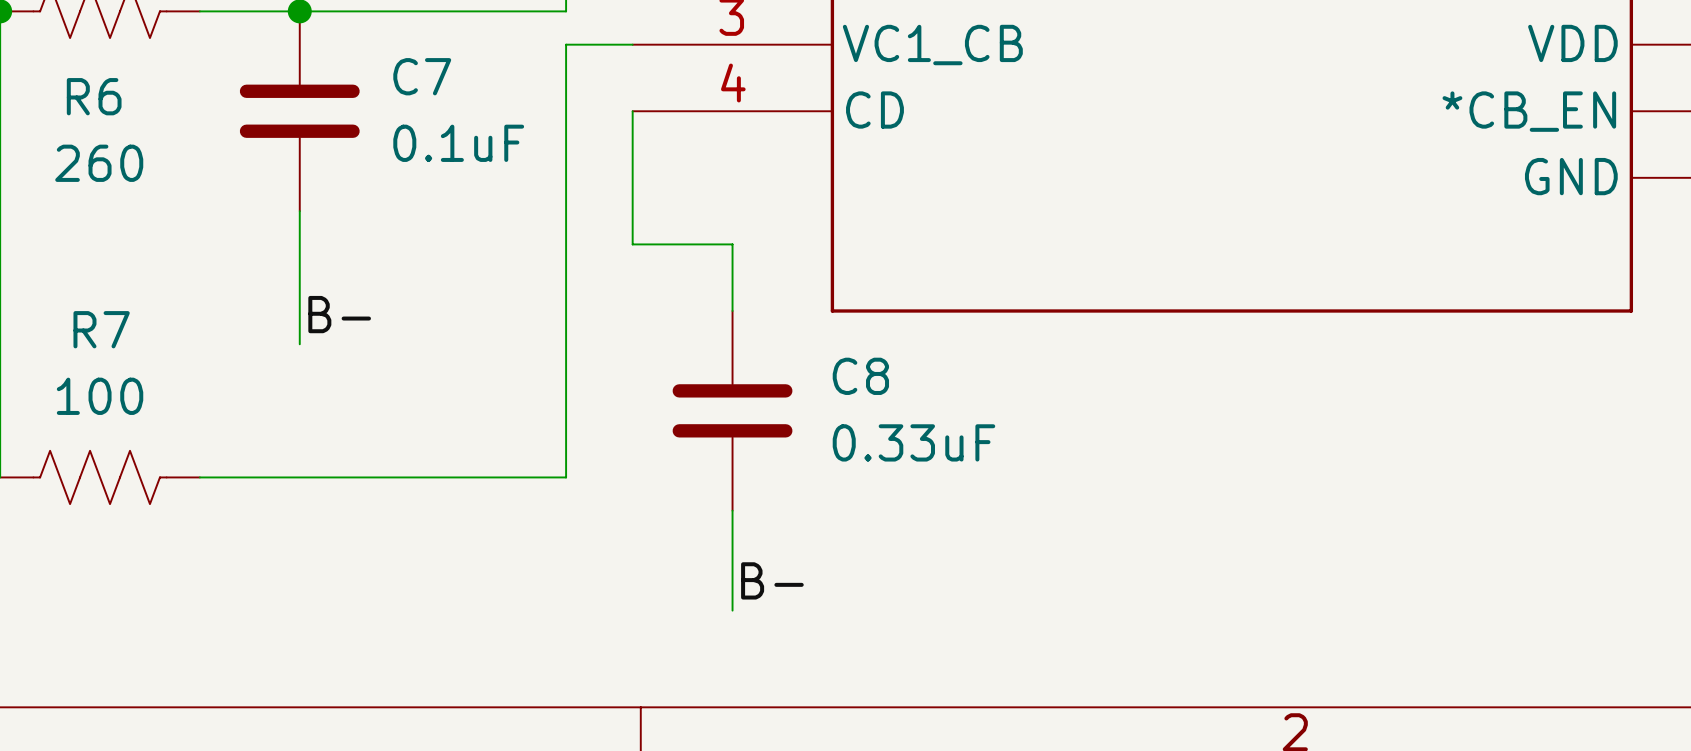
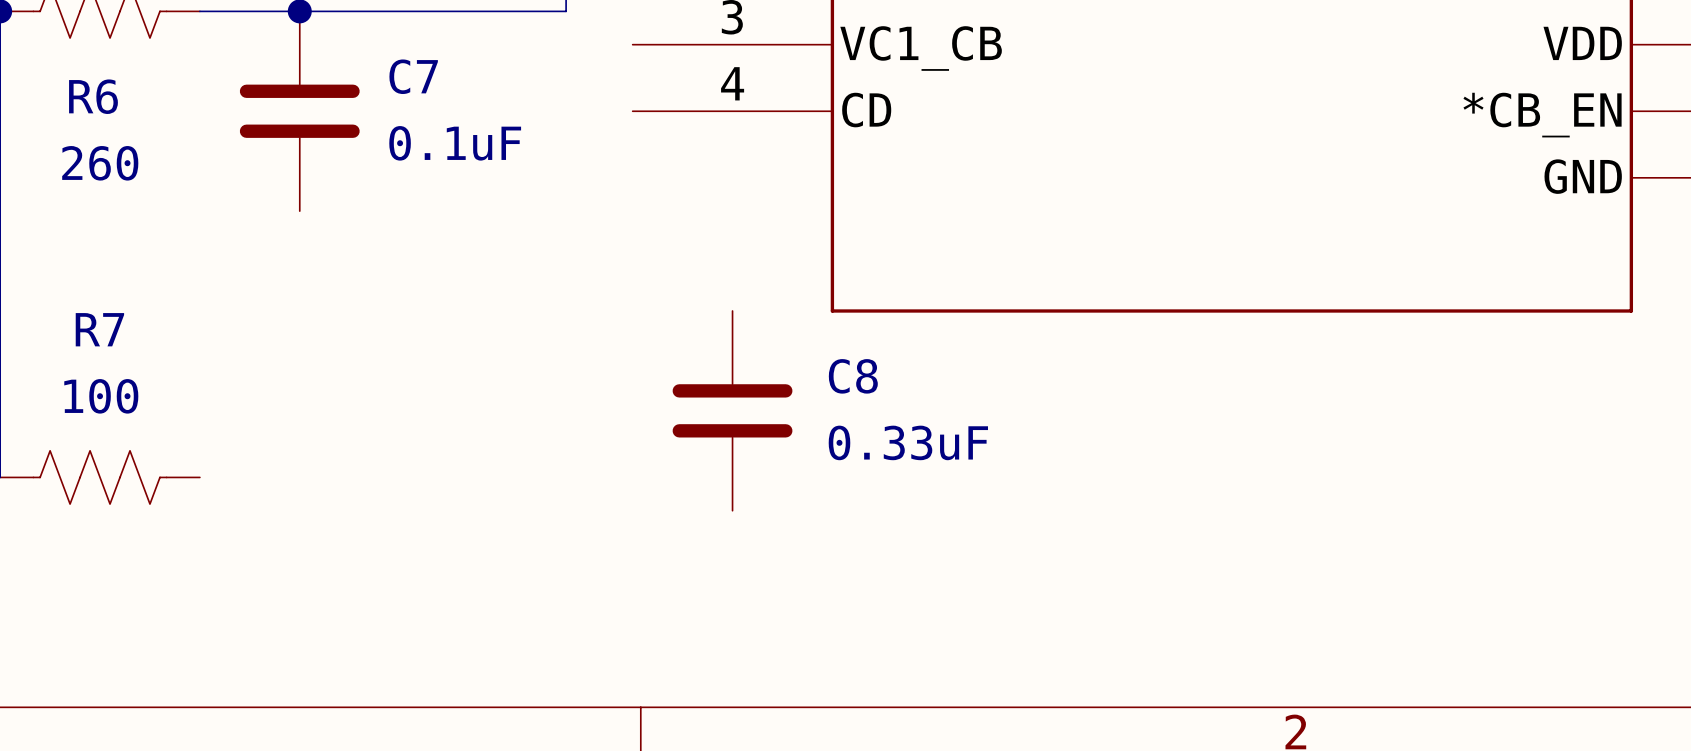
wire: (632, 44) (566, 44) (566, 477) (199, 477) -> none
wire: (632, 111) (632, 244) (732, 244) (732, 310) -> none
wire: (299, 211) (299, 344) -> none
label: B- (339, 314) -> none
wire: (732, 510) (732, 610) -> none
label: B- (772, 580) -> none

